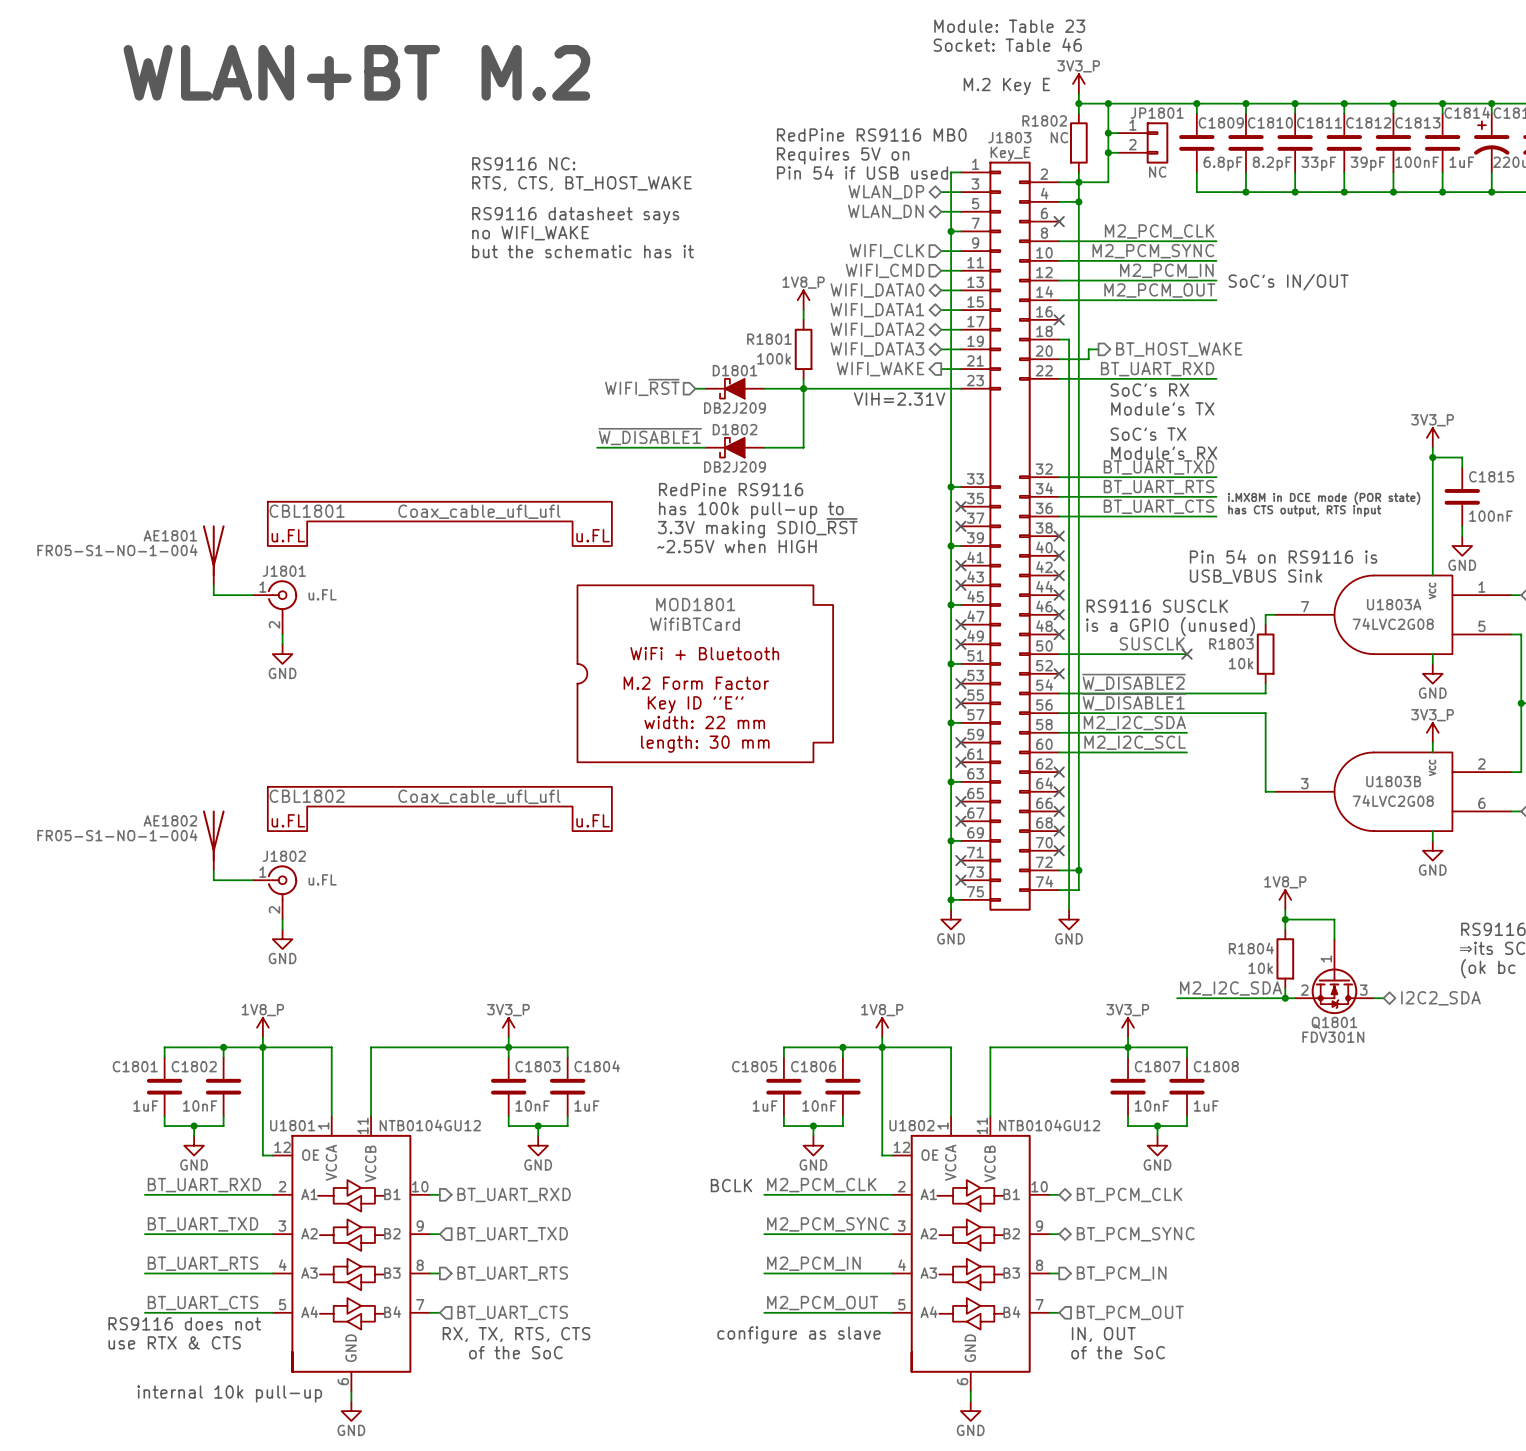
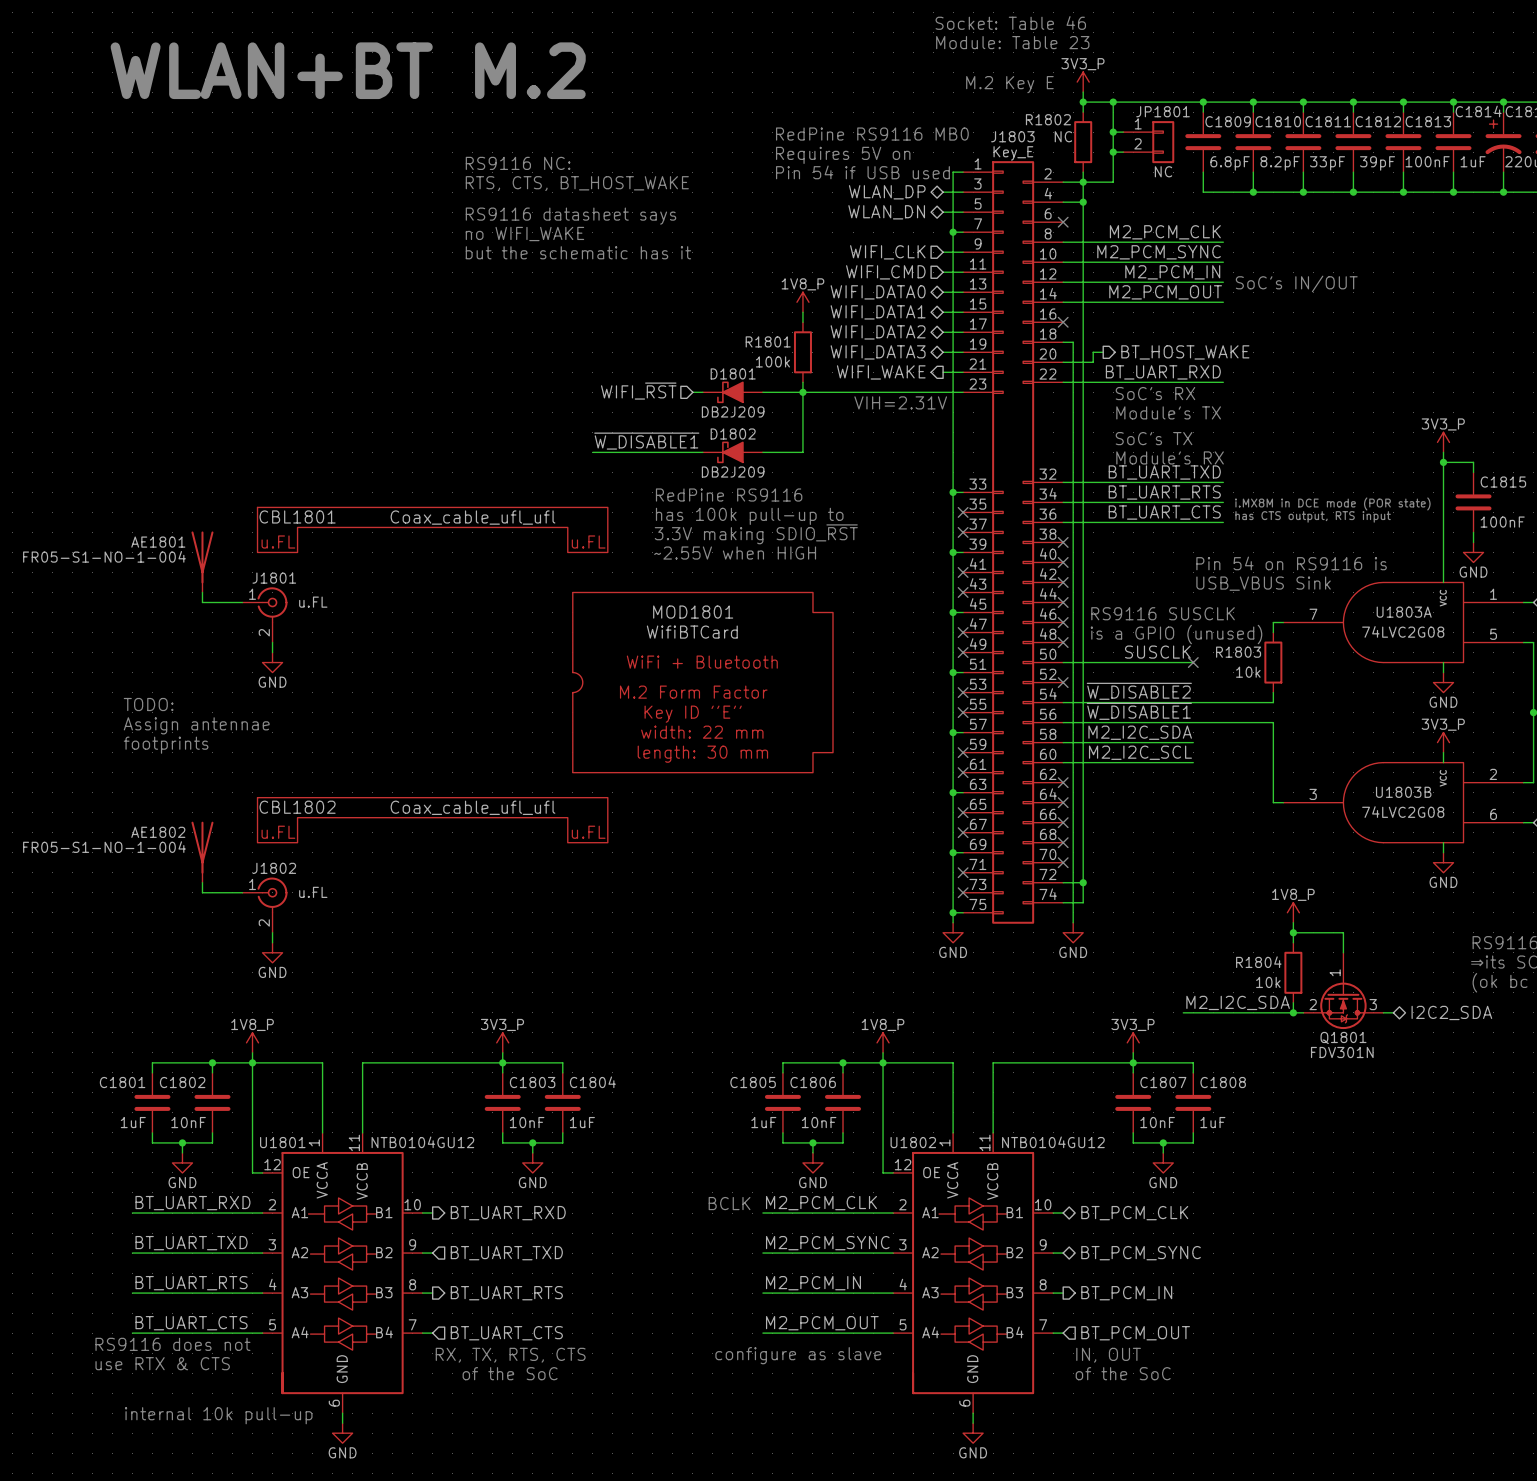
text: Module: Table 23 (1009, 26) -> Socket: Table 46 (1010, 22)
text: Socket: Table 46 (1007, 44) -> Module: Table 23 (1012, 42)
text: none -> TODO: (148, 704)
text: none -> Assign antennae (196, 725)
text: none -> footprints (166, 745)

